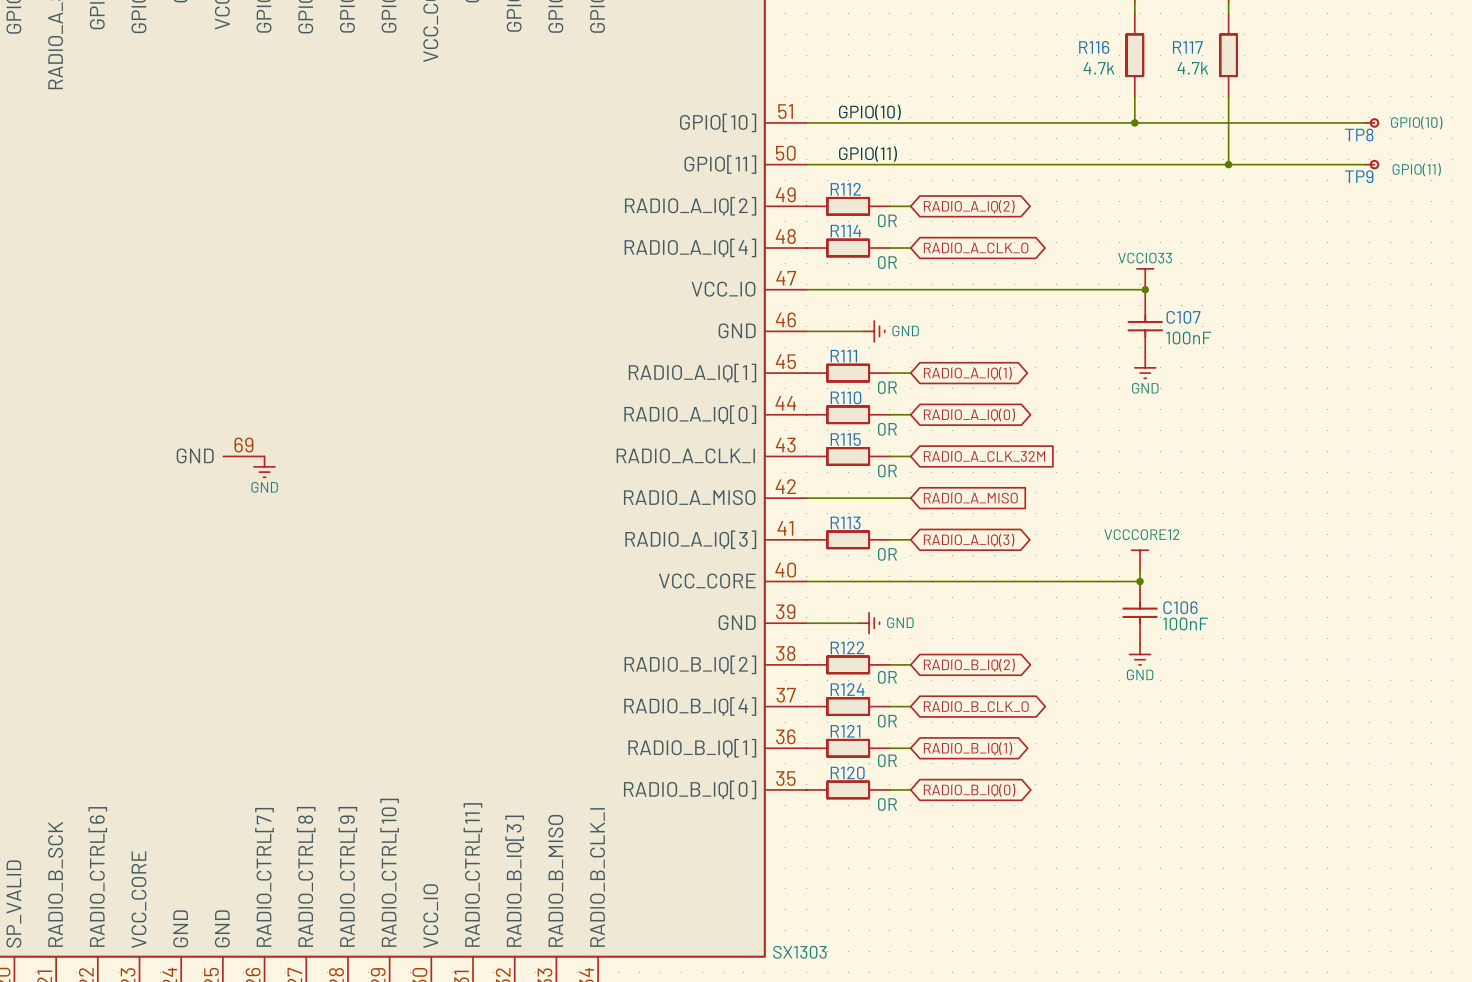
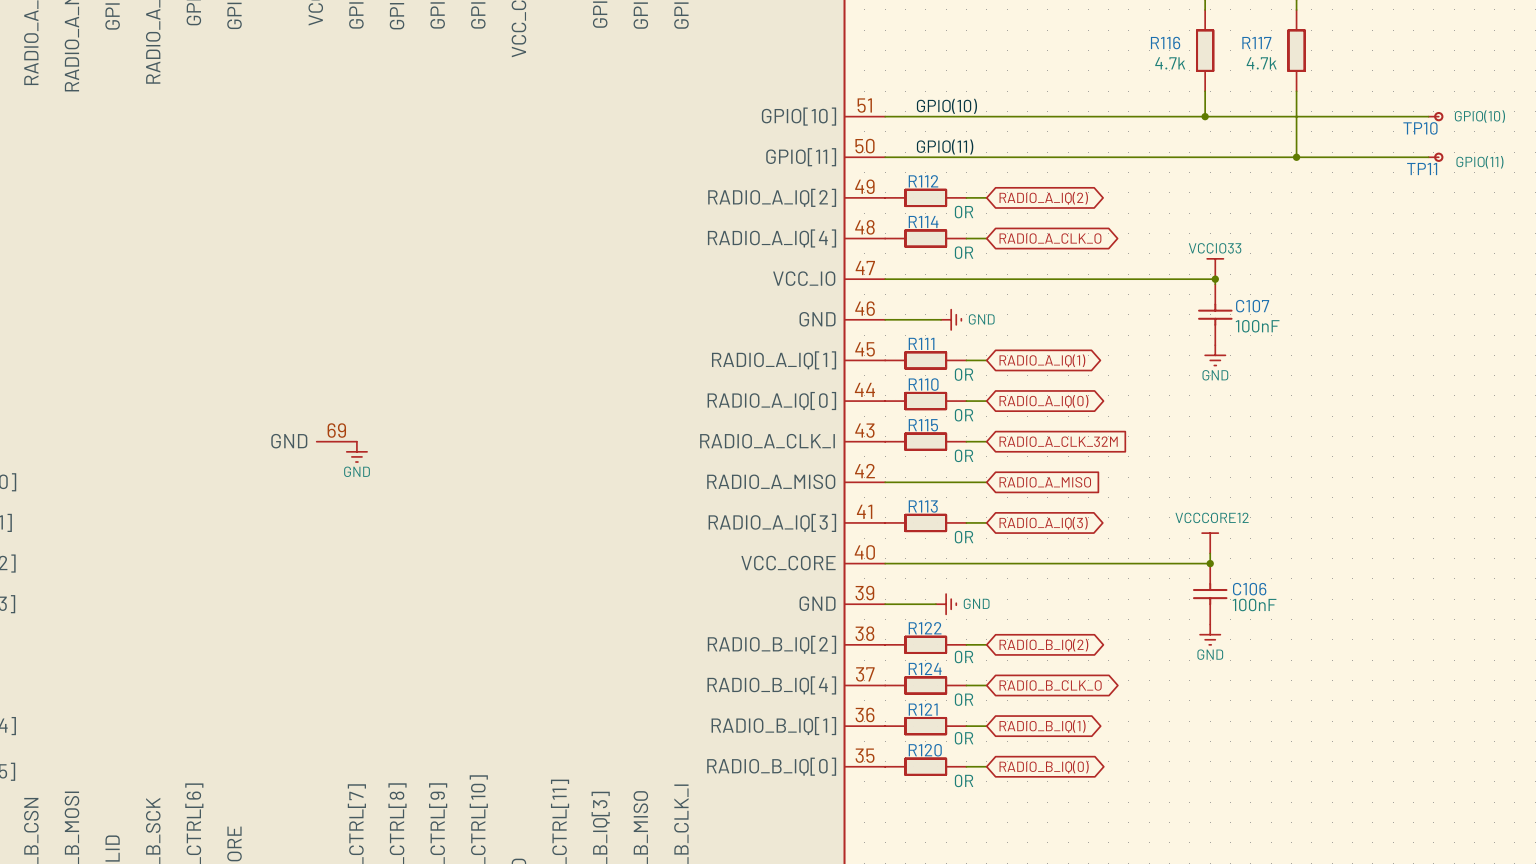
TP8 name: TP8 (1359, 134) -> TP10 (1420, 128)
TP9 name: TP9 (1359, 176) -> TP11 (1422, 169)

